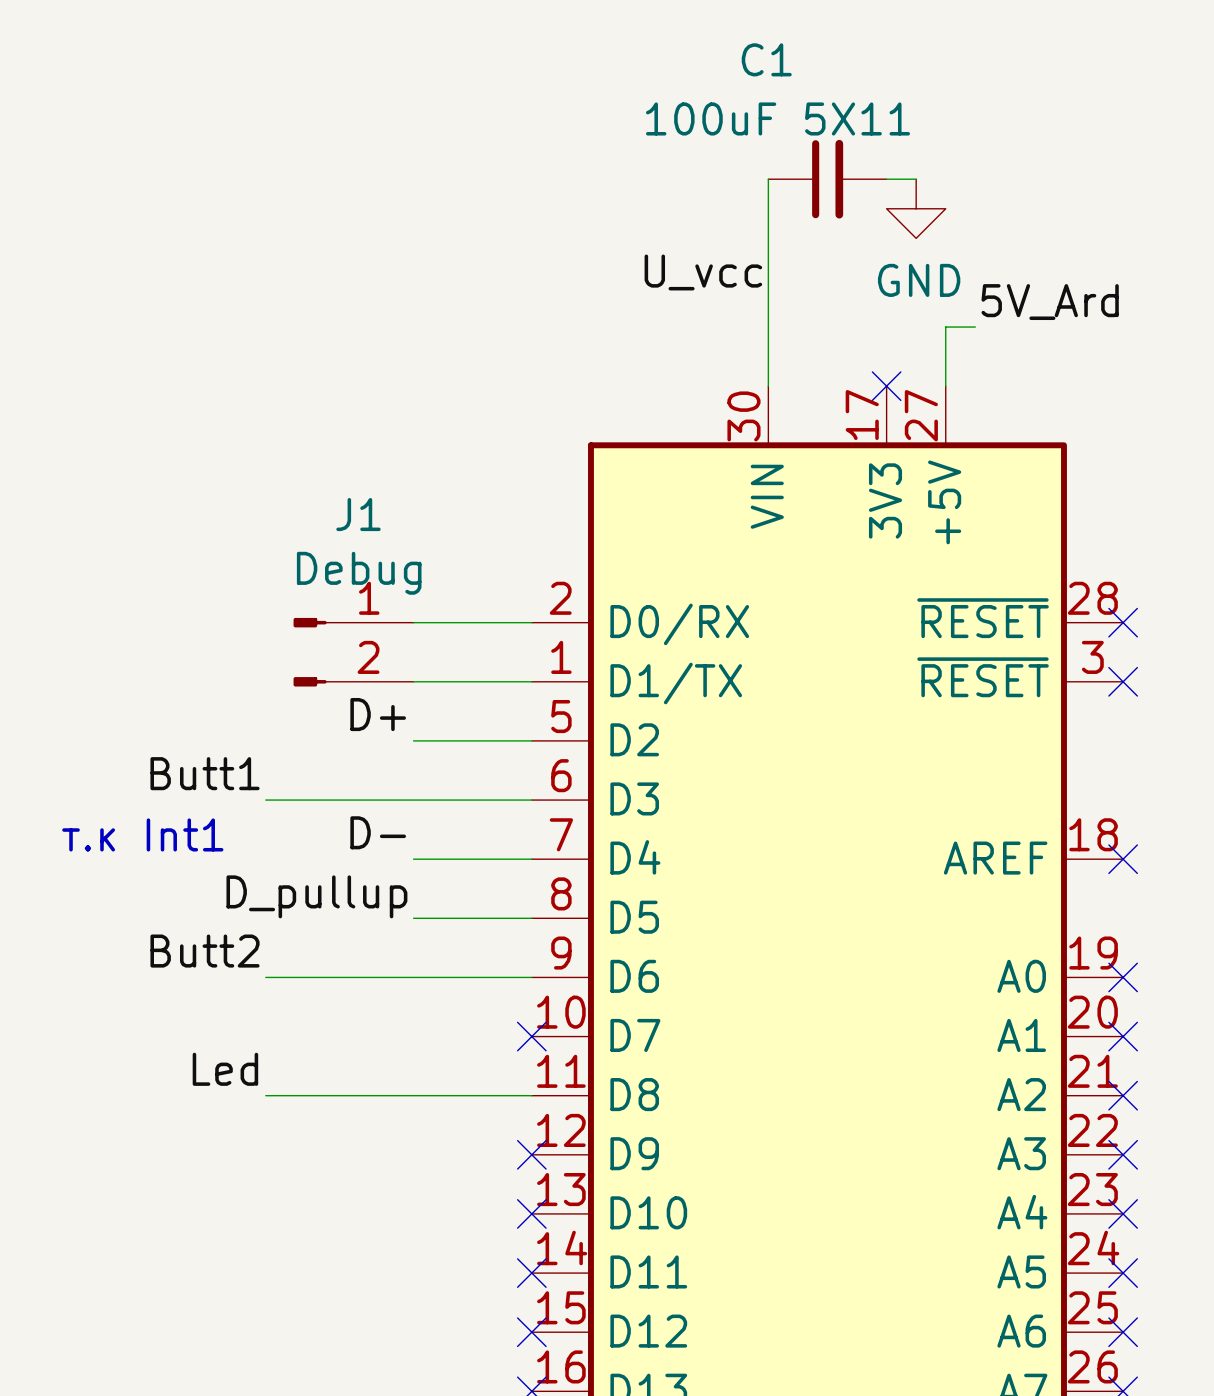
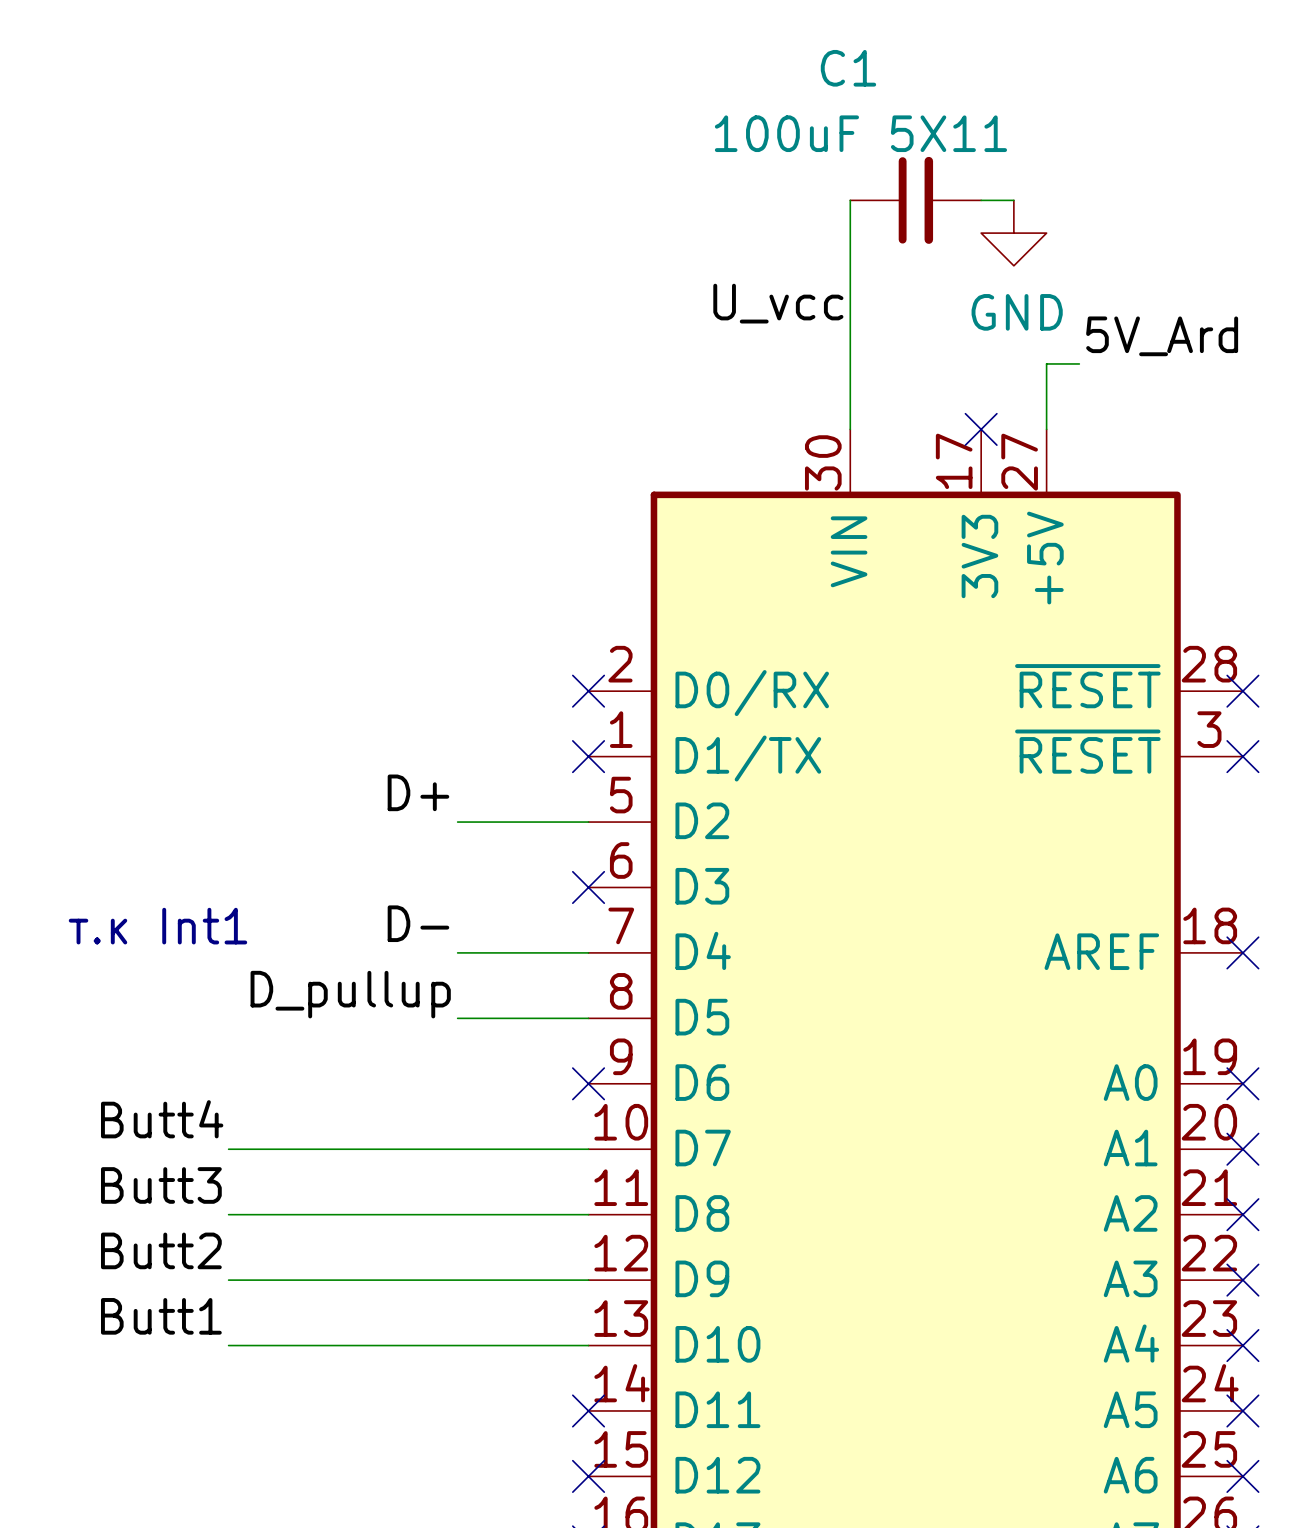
wire: (413, 622) (531, 622) -> none
no-connect mark: none -> (588, 691)
J1: Debug (353, 652) -> none
wire: (413, 681) (531, 681) -> none
no-connect mark: none -> (588, 756)
label position: Butt1 (205, 773) -> Butt1 (161, 1316)
wire: (265, 800) (531, 800) -> none
no-connect mark: none -> (588, 887)
label position: Butt2 (205, 951) -> Butt2 (161, 1250)
wire: (265, 977) (531, 977) -> none
label: none -> Butt4 (162, 1119)
wire: none -> (228, 1149) (588, 1149)
no-connect mark position: (531, 1036) -> (588, 1083)
label: none -> Butt3 (161, 1185)
label: Led (225, 1069) -> none
wire: none -> (228, 1214) (294, 1214)
wire: none -> (228, 1280) (588, 1280)
no-connect mark: (531, 1154) -> none
wire: none -> (228, 1345) (588, 1345)
no-connect mark: (531, 1213) -> none

